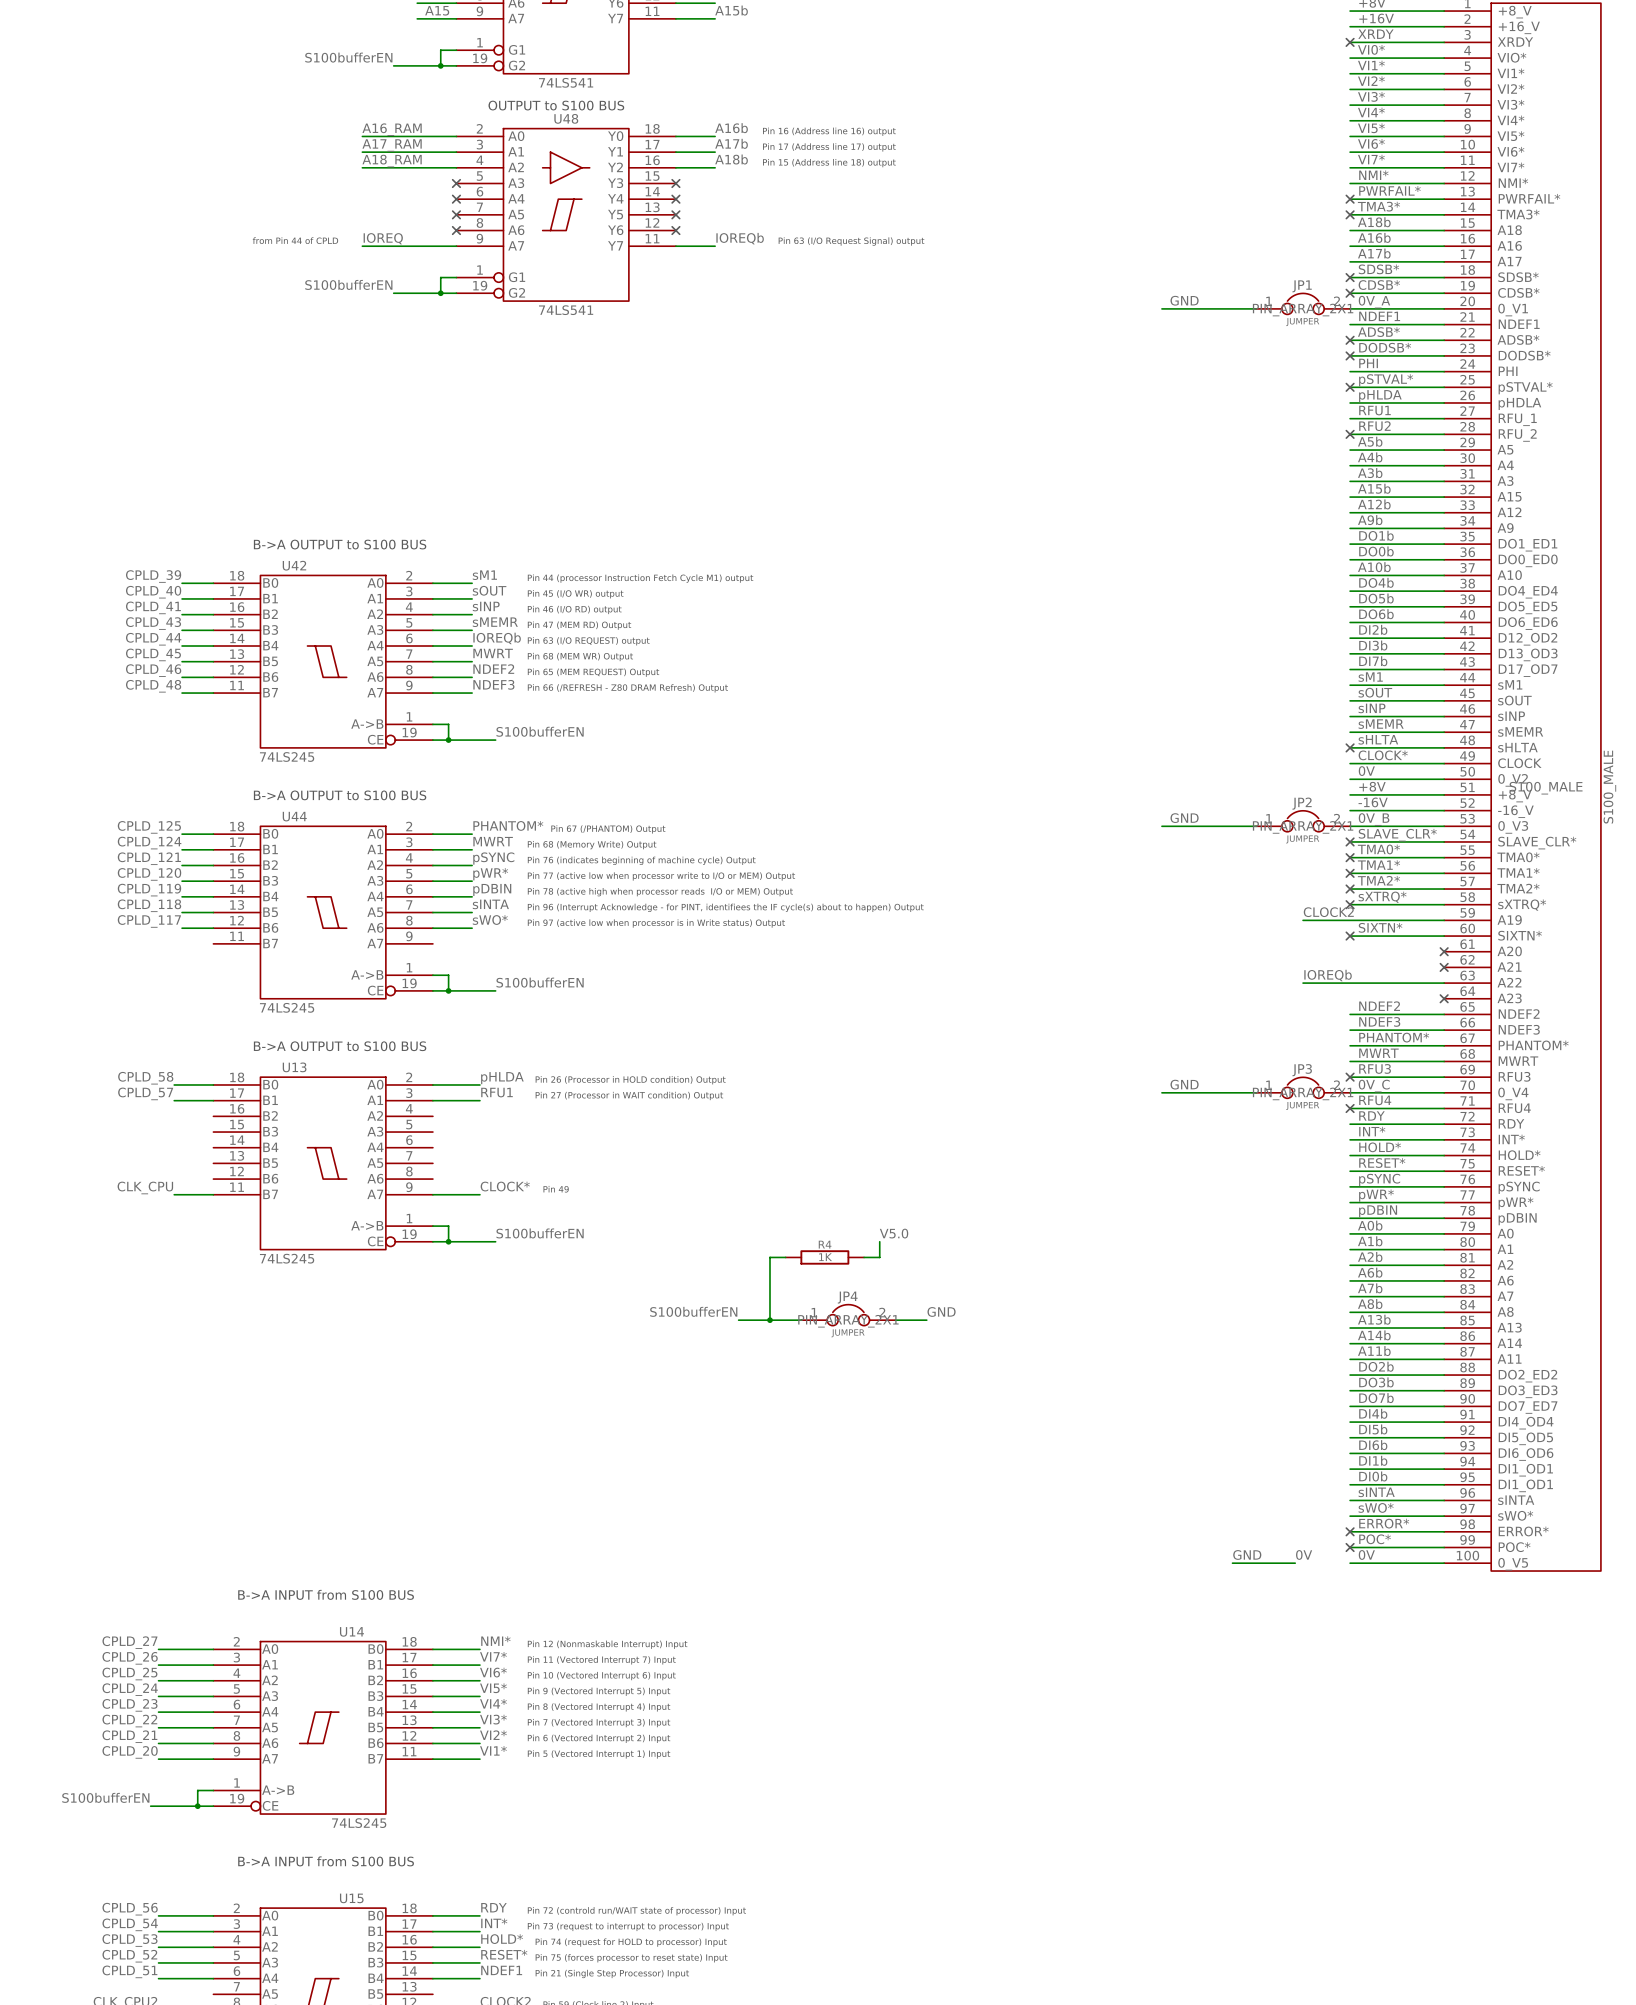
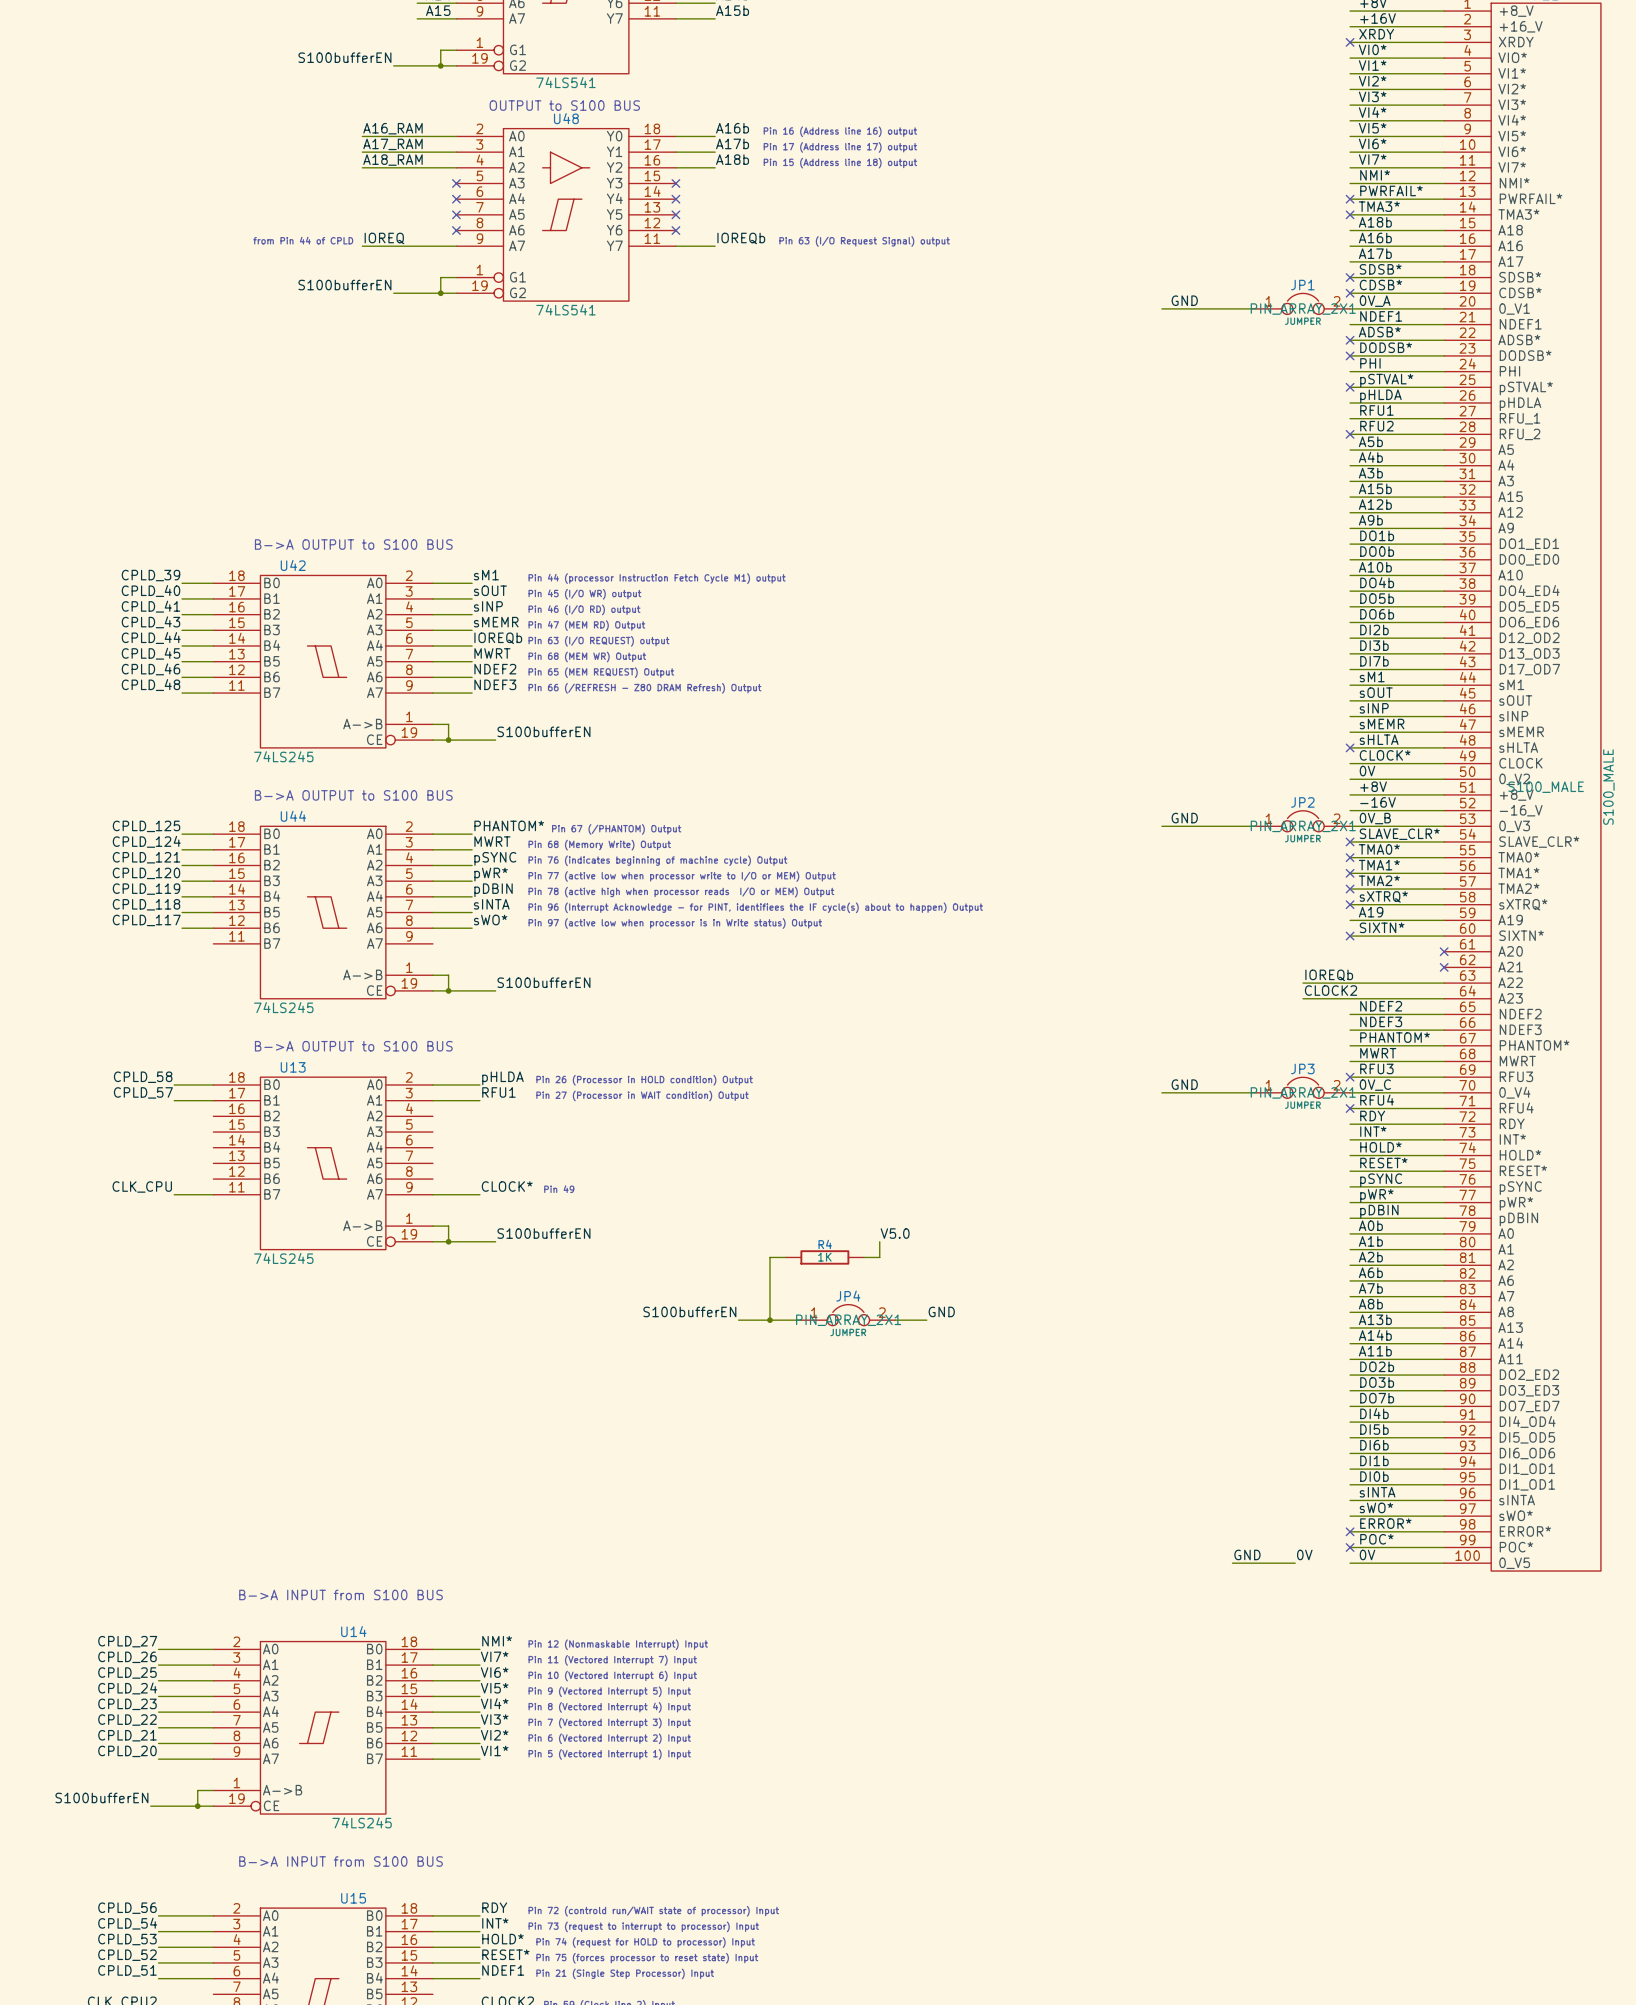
label position: CLOCK2 (1328, 912) -> CLOCK2 (1330, 990)
label: none -> A19 (1371, 912)
wire: (1303, 920) (1350, 920) -> none
wire: none -> (1303, 998) (1444, 998)
no-connect mark: (1444, 998) -> none

